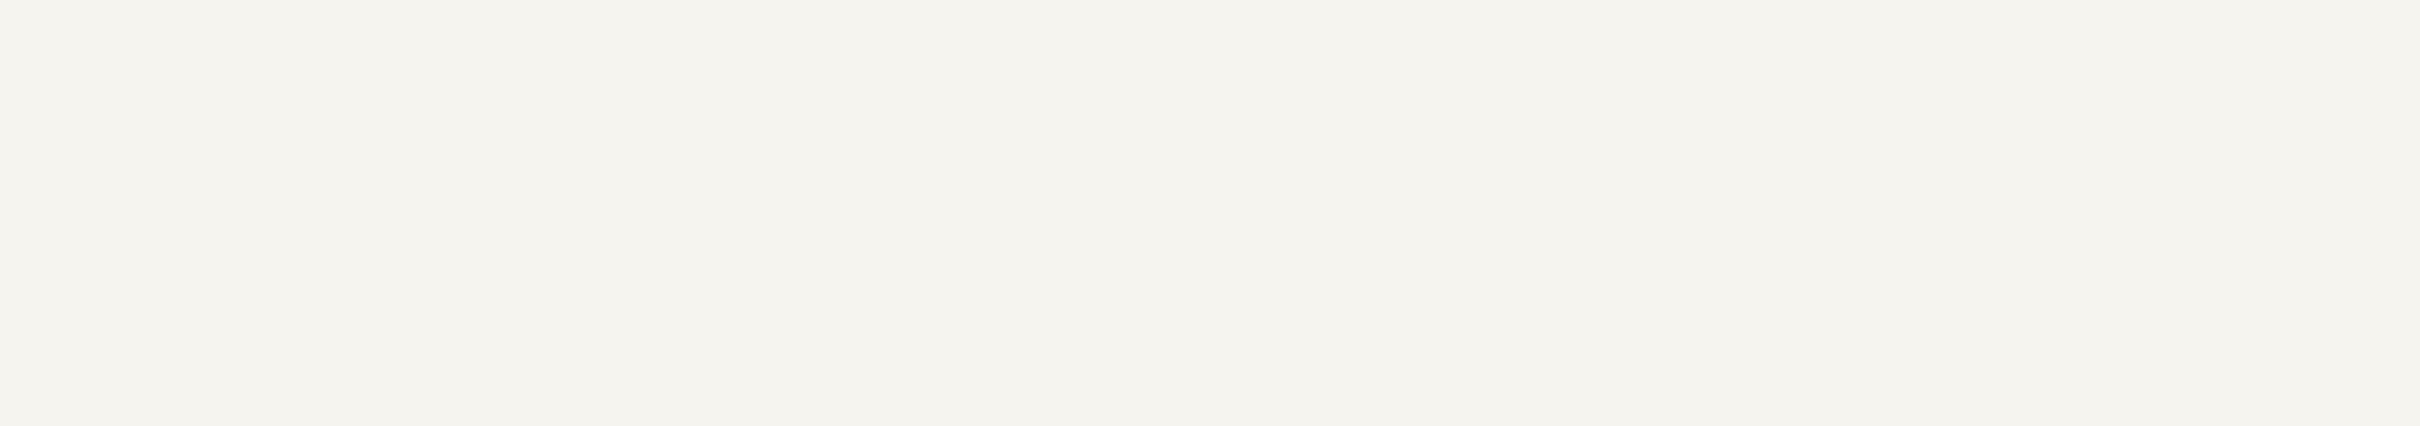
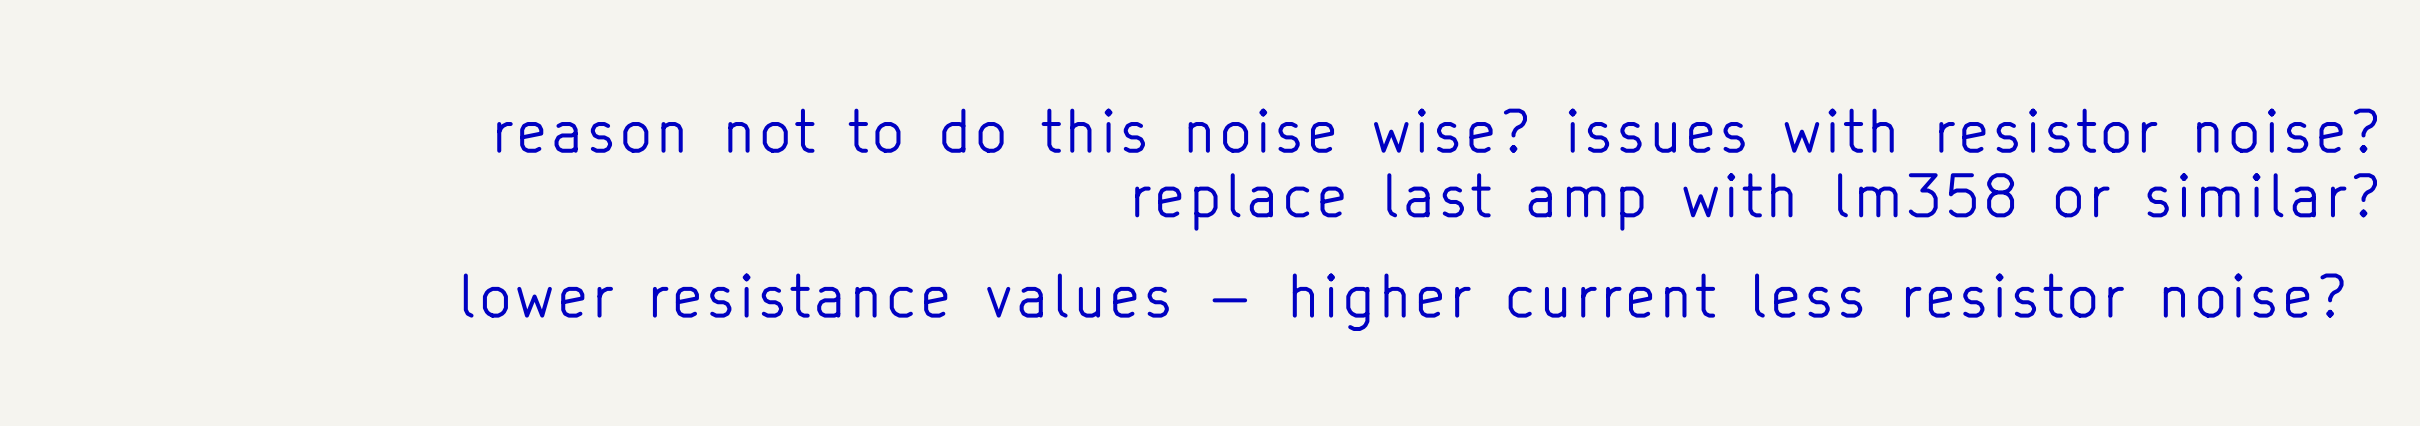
text: none -> reason not to do this noise wise? issues with resistor noise? (1437, 130)
text: none -> replace last amp with lm358 or similar? (1756, 201)
text: none -> lower resistance values - higher current less resistor noise? (1403, 302)

